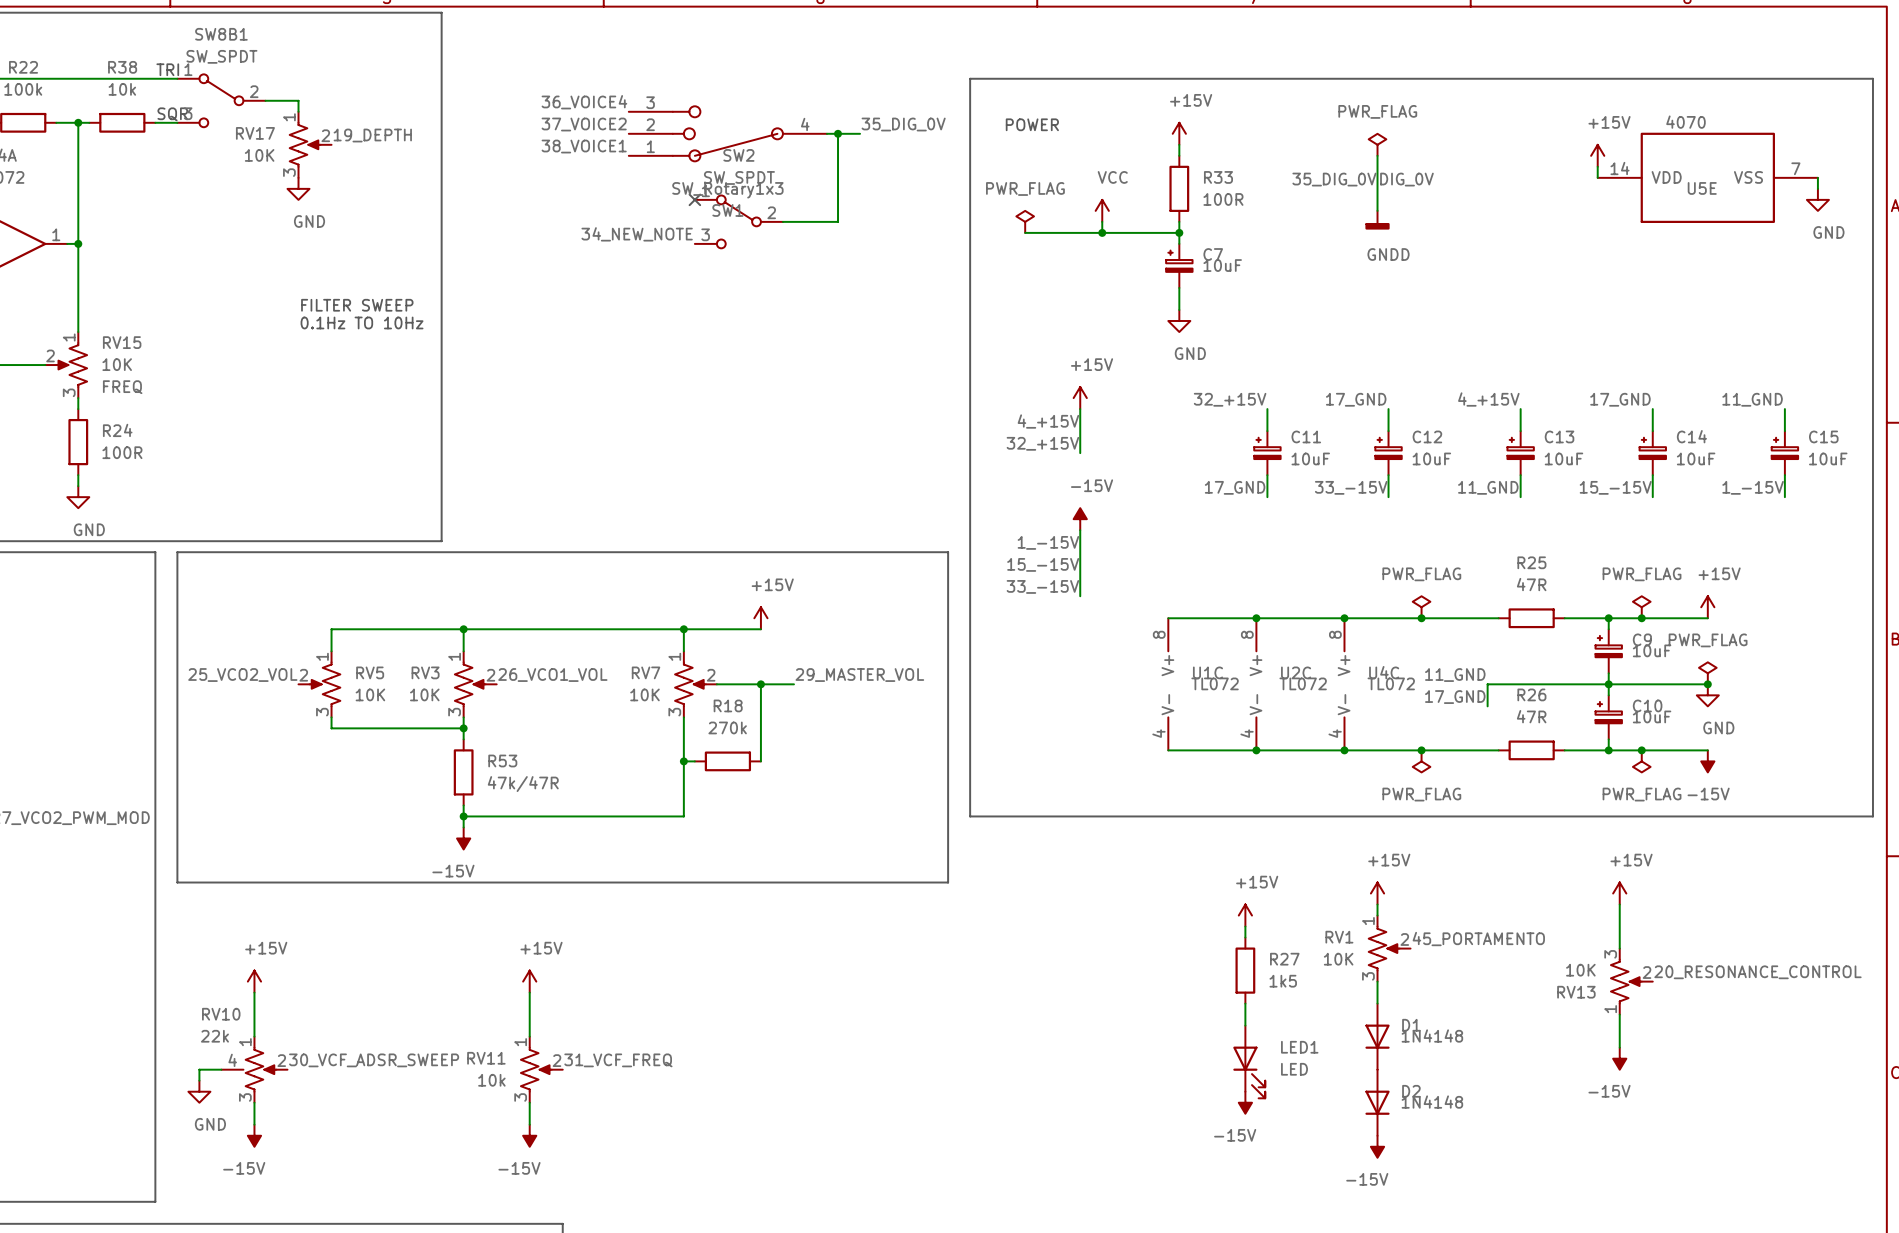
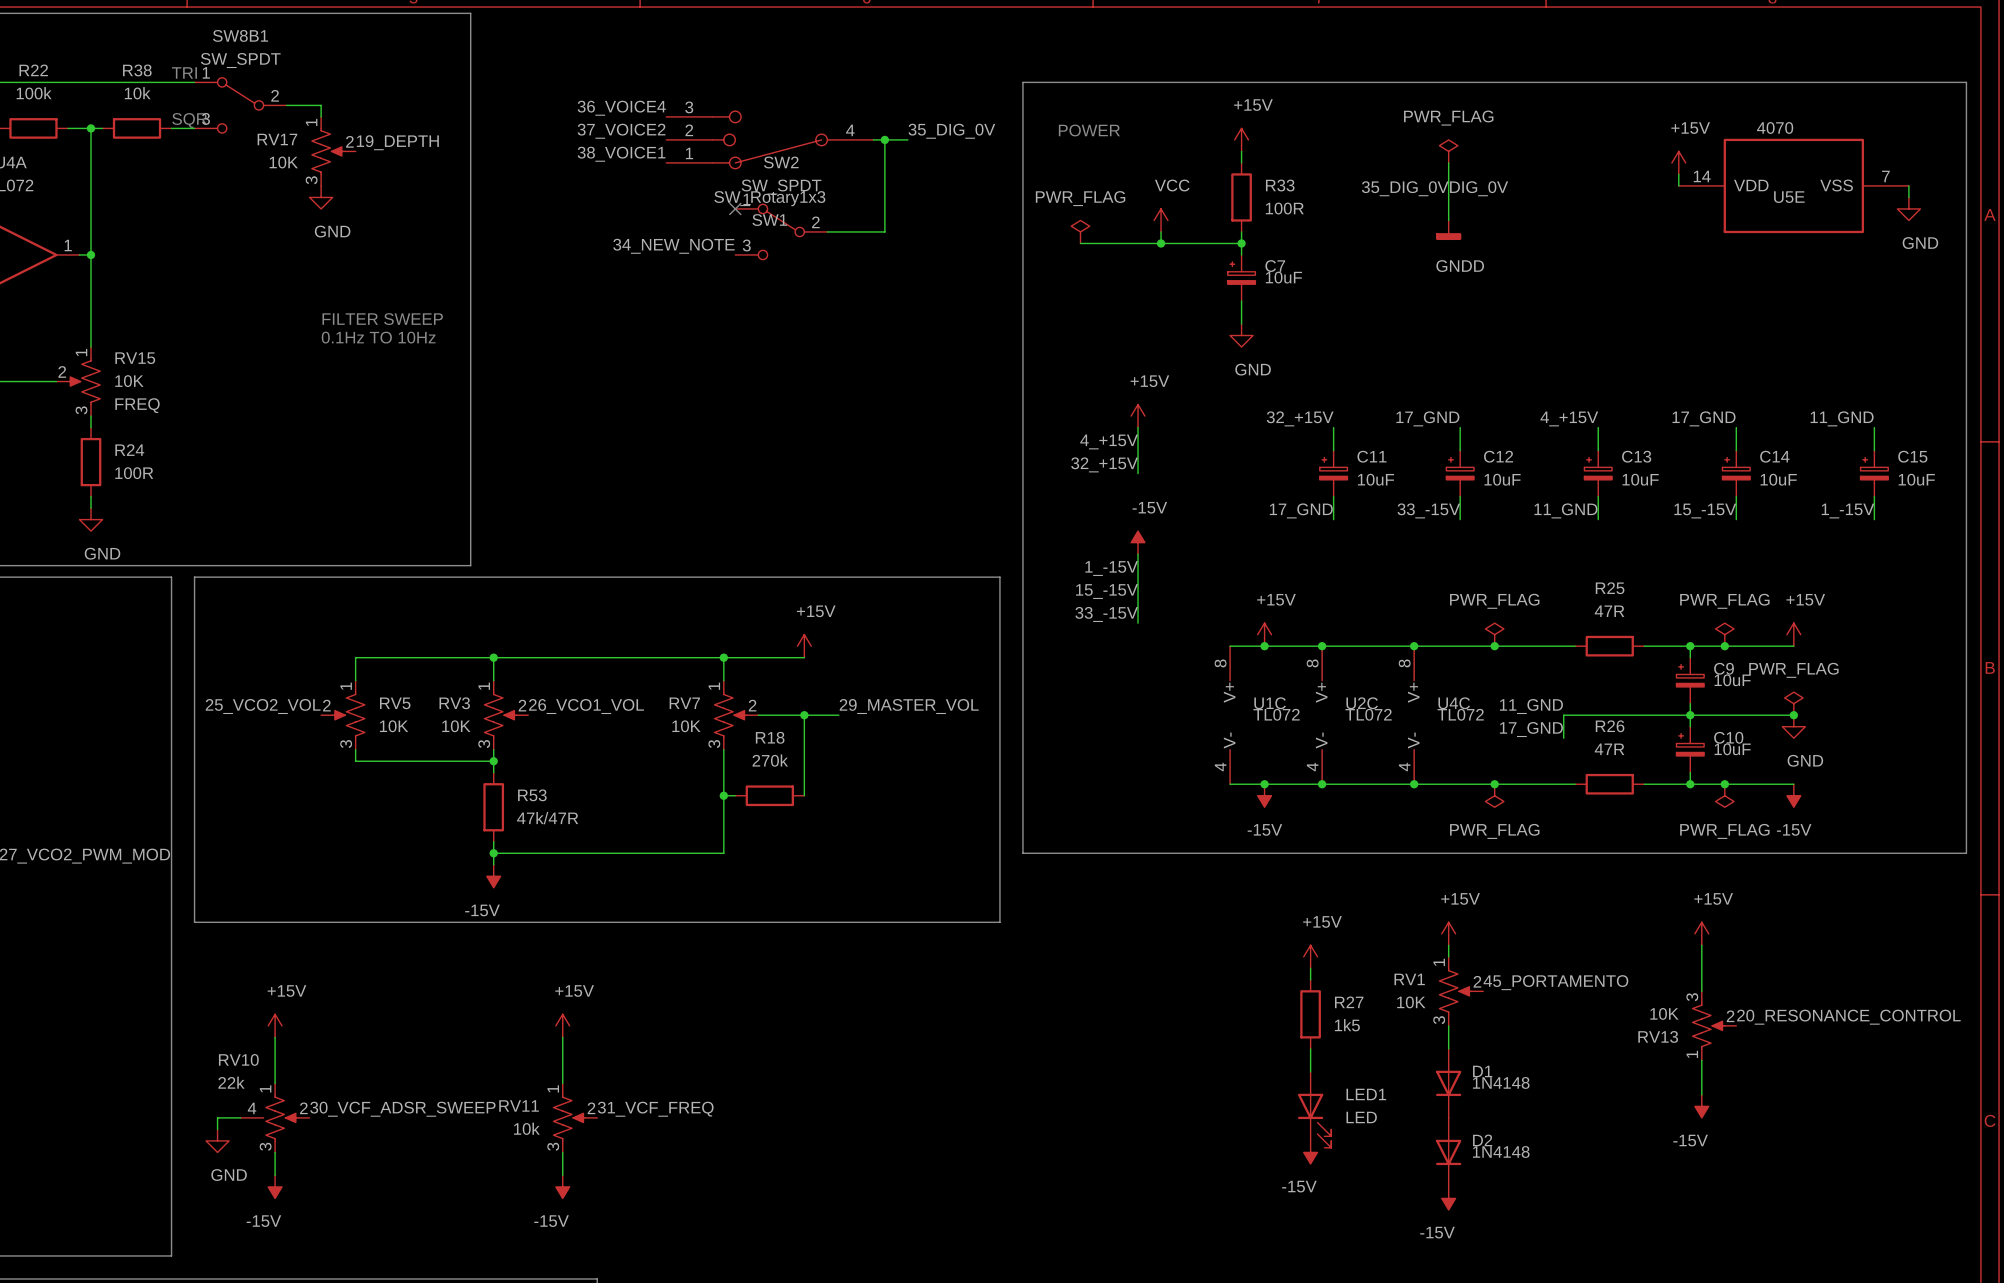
power symbol: none -> +15V (1264, 634)
junction: none -> (1264, 646)
junction: none -> (1264, 784)
power symbol: none -> -15V (1264, 795)

